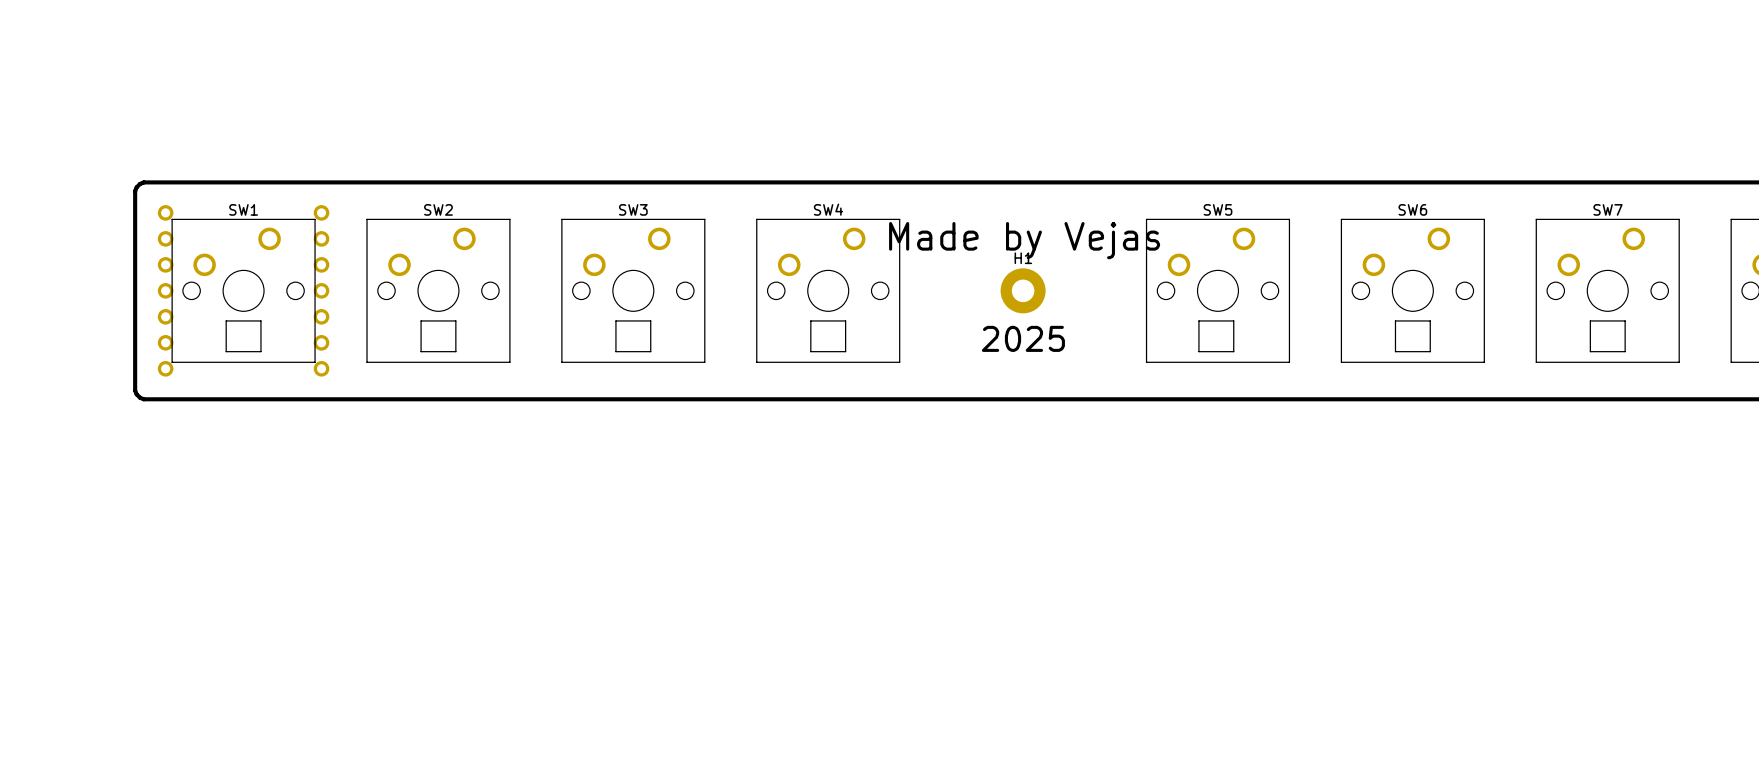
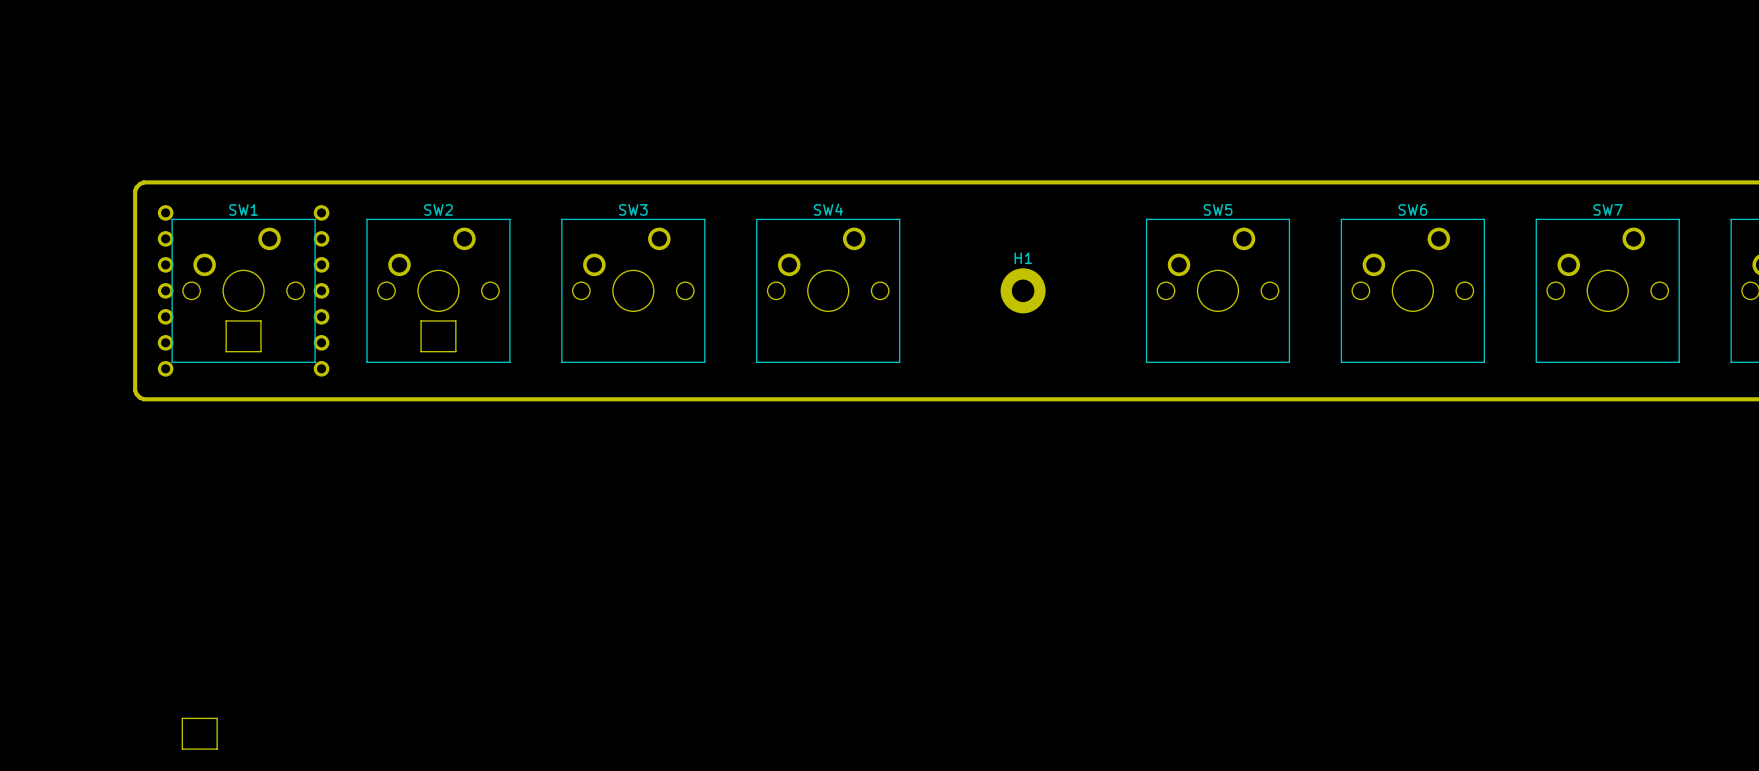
text: Made by Vejas (1024, 240) -> none
part: (633, 336) -> none
part: (828, 336) -> none
part: (1216, 336) -> none
part: (1412, 336) -> none
part: (1607, 336) -> none
text: 2025 (1023, 338) -> none
part: none -> (199, 733)

